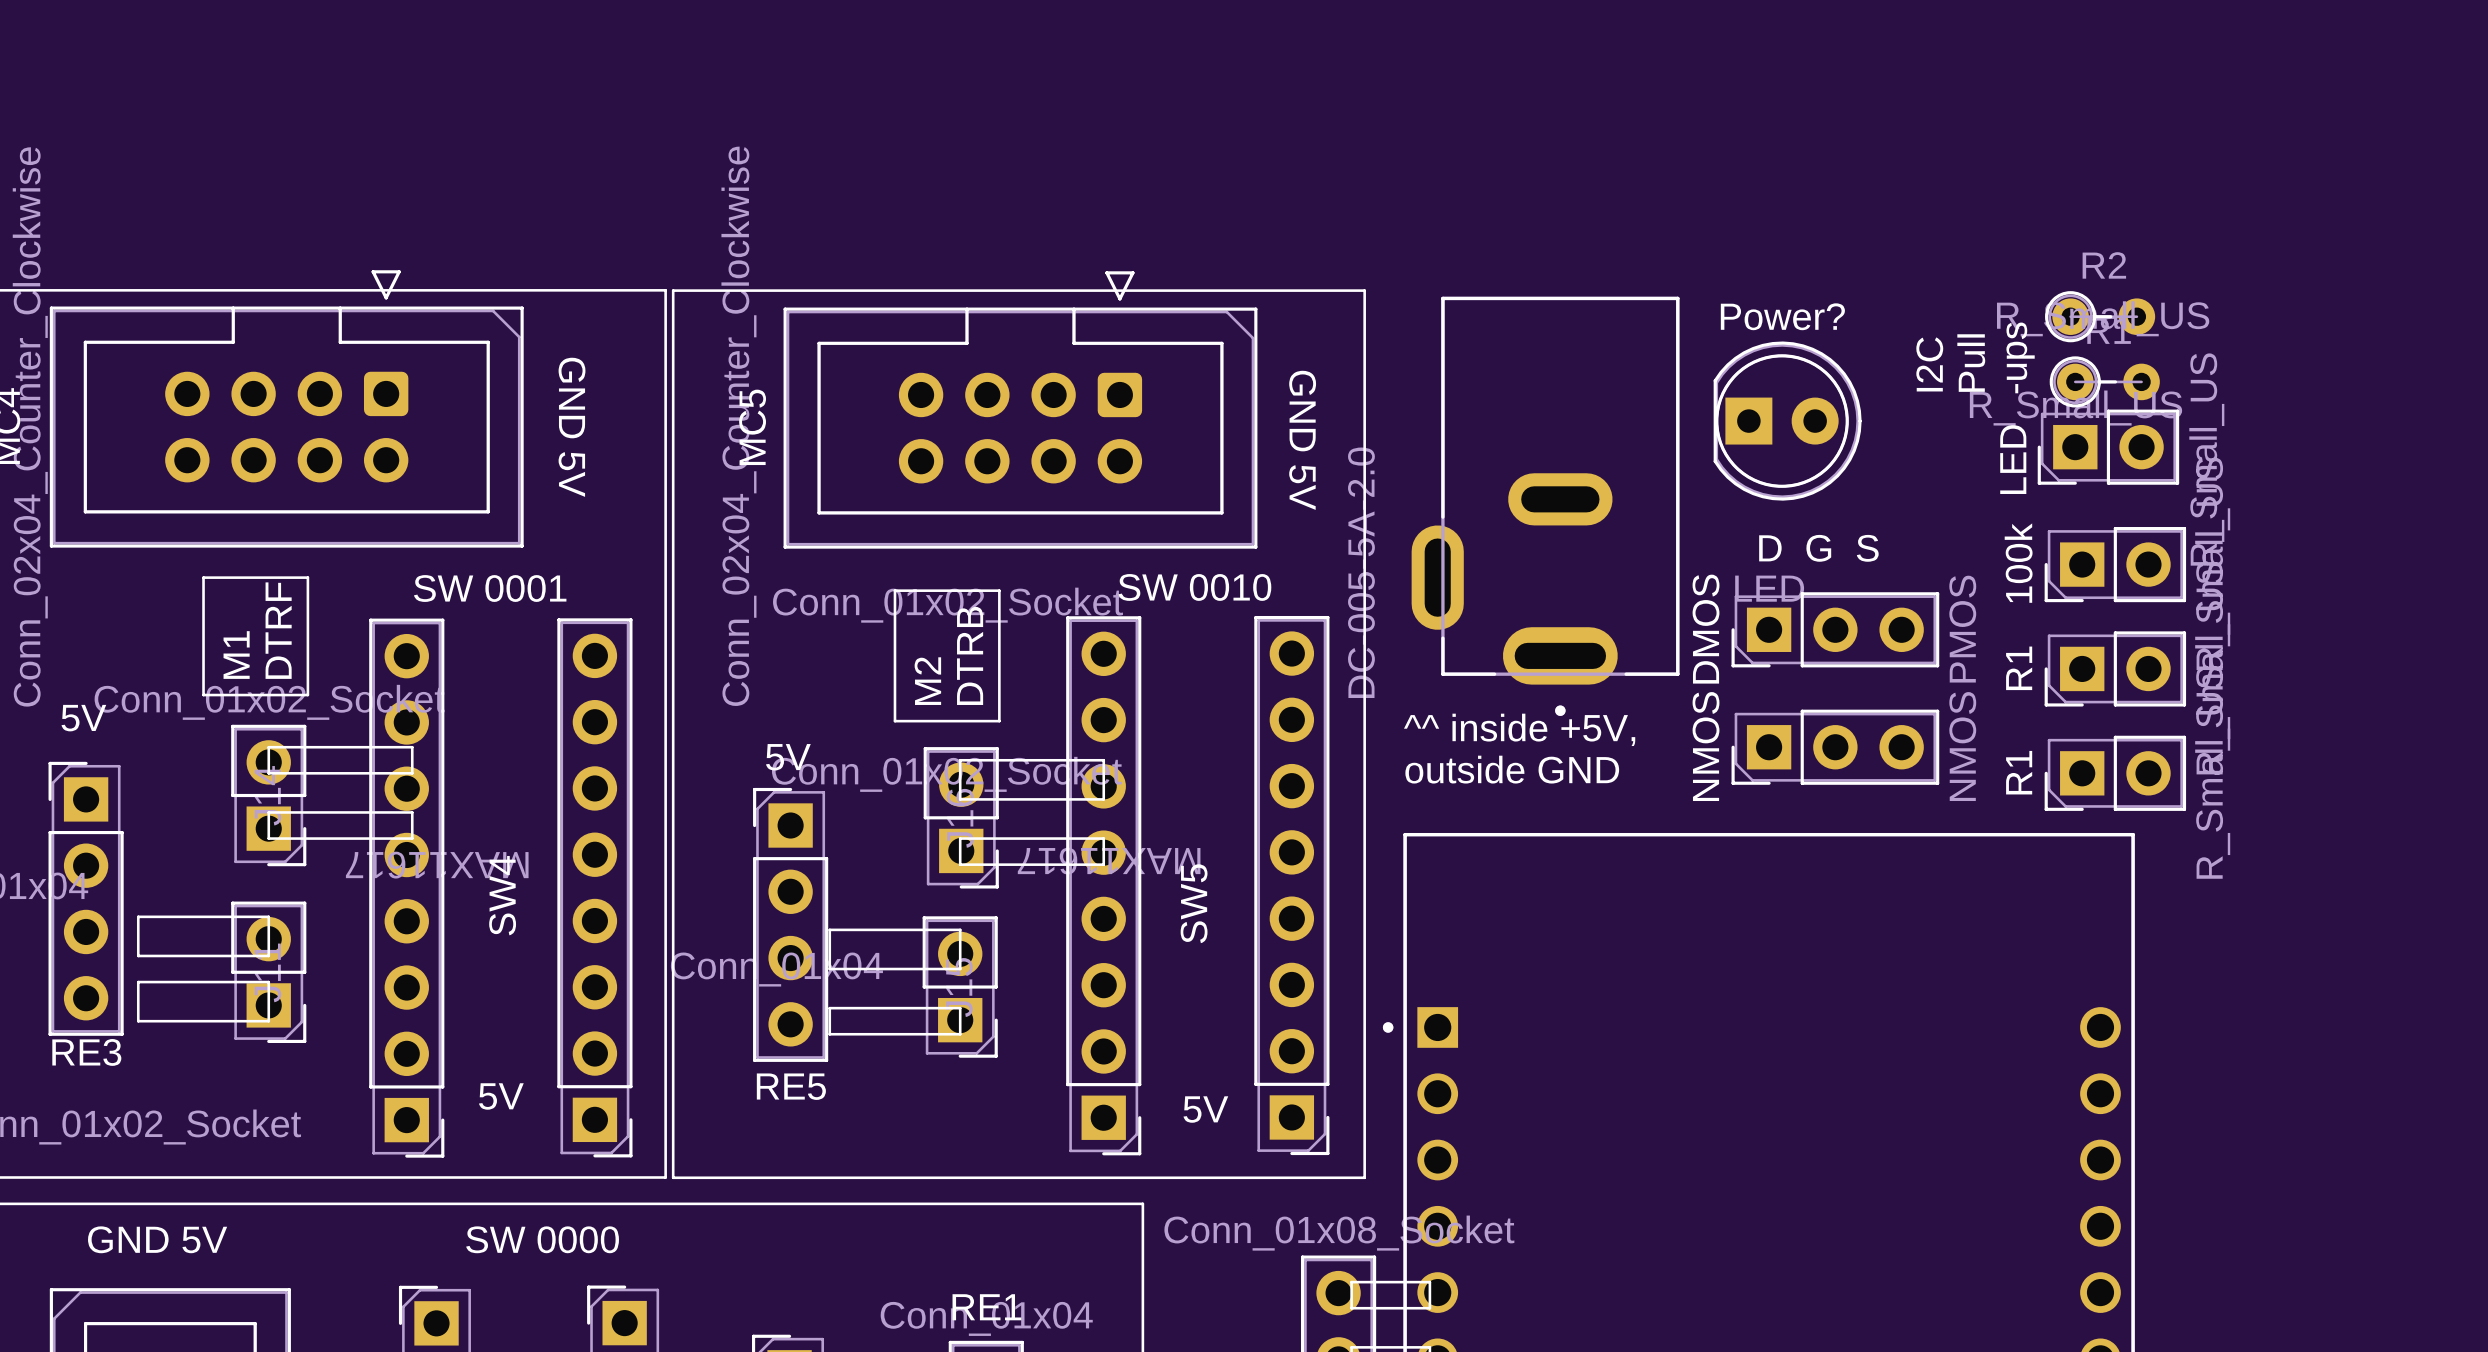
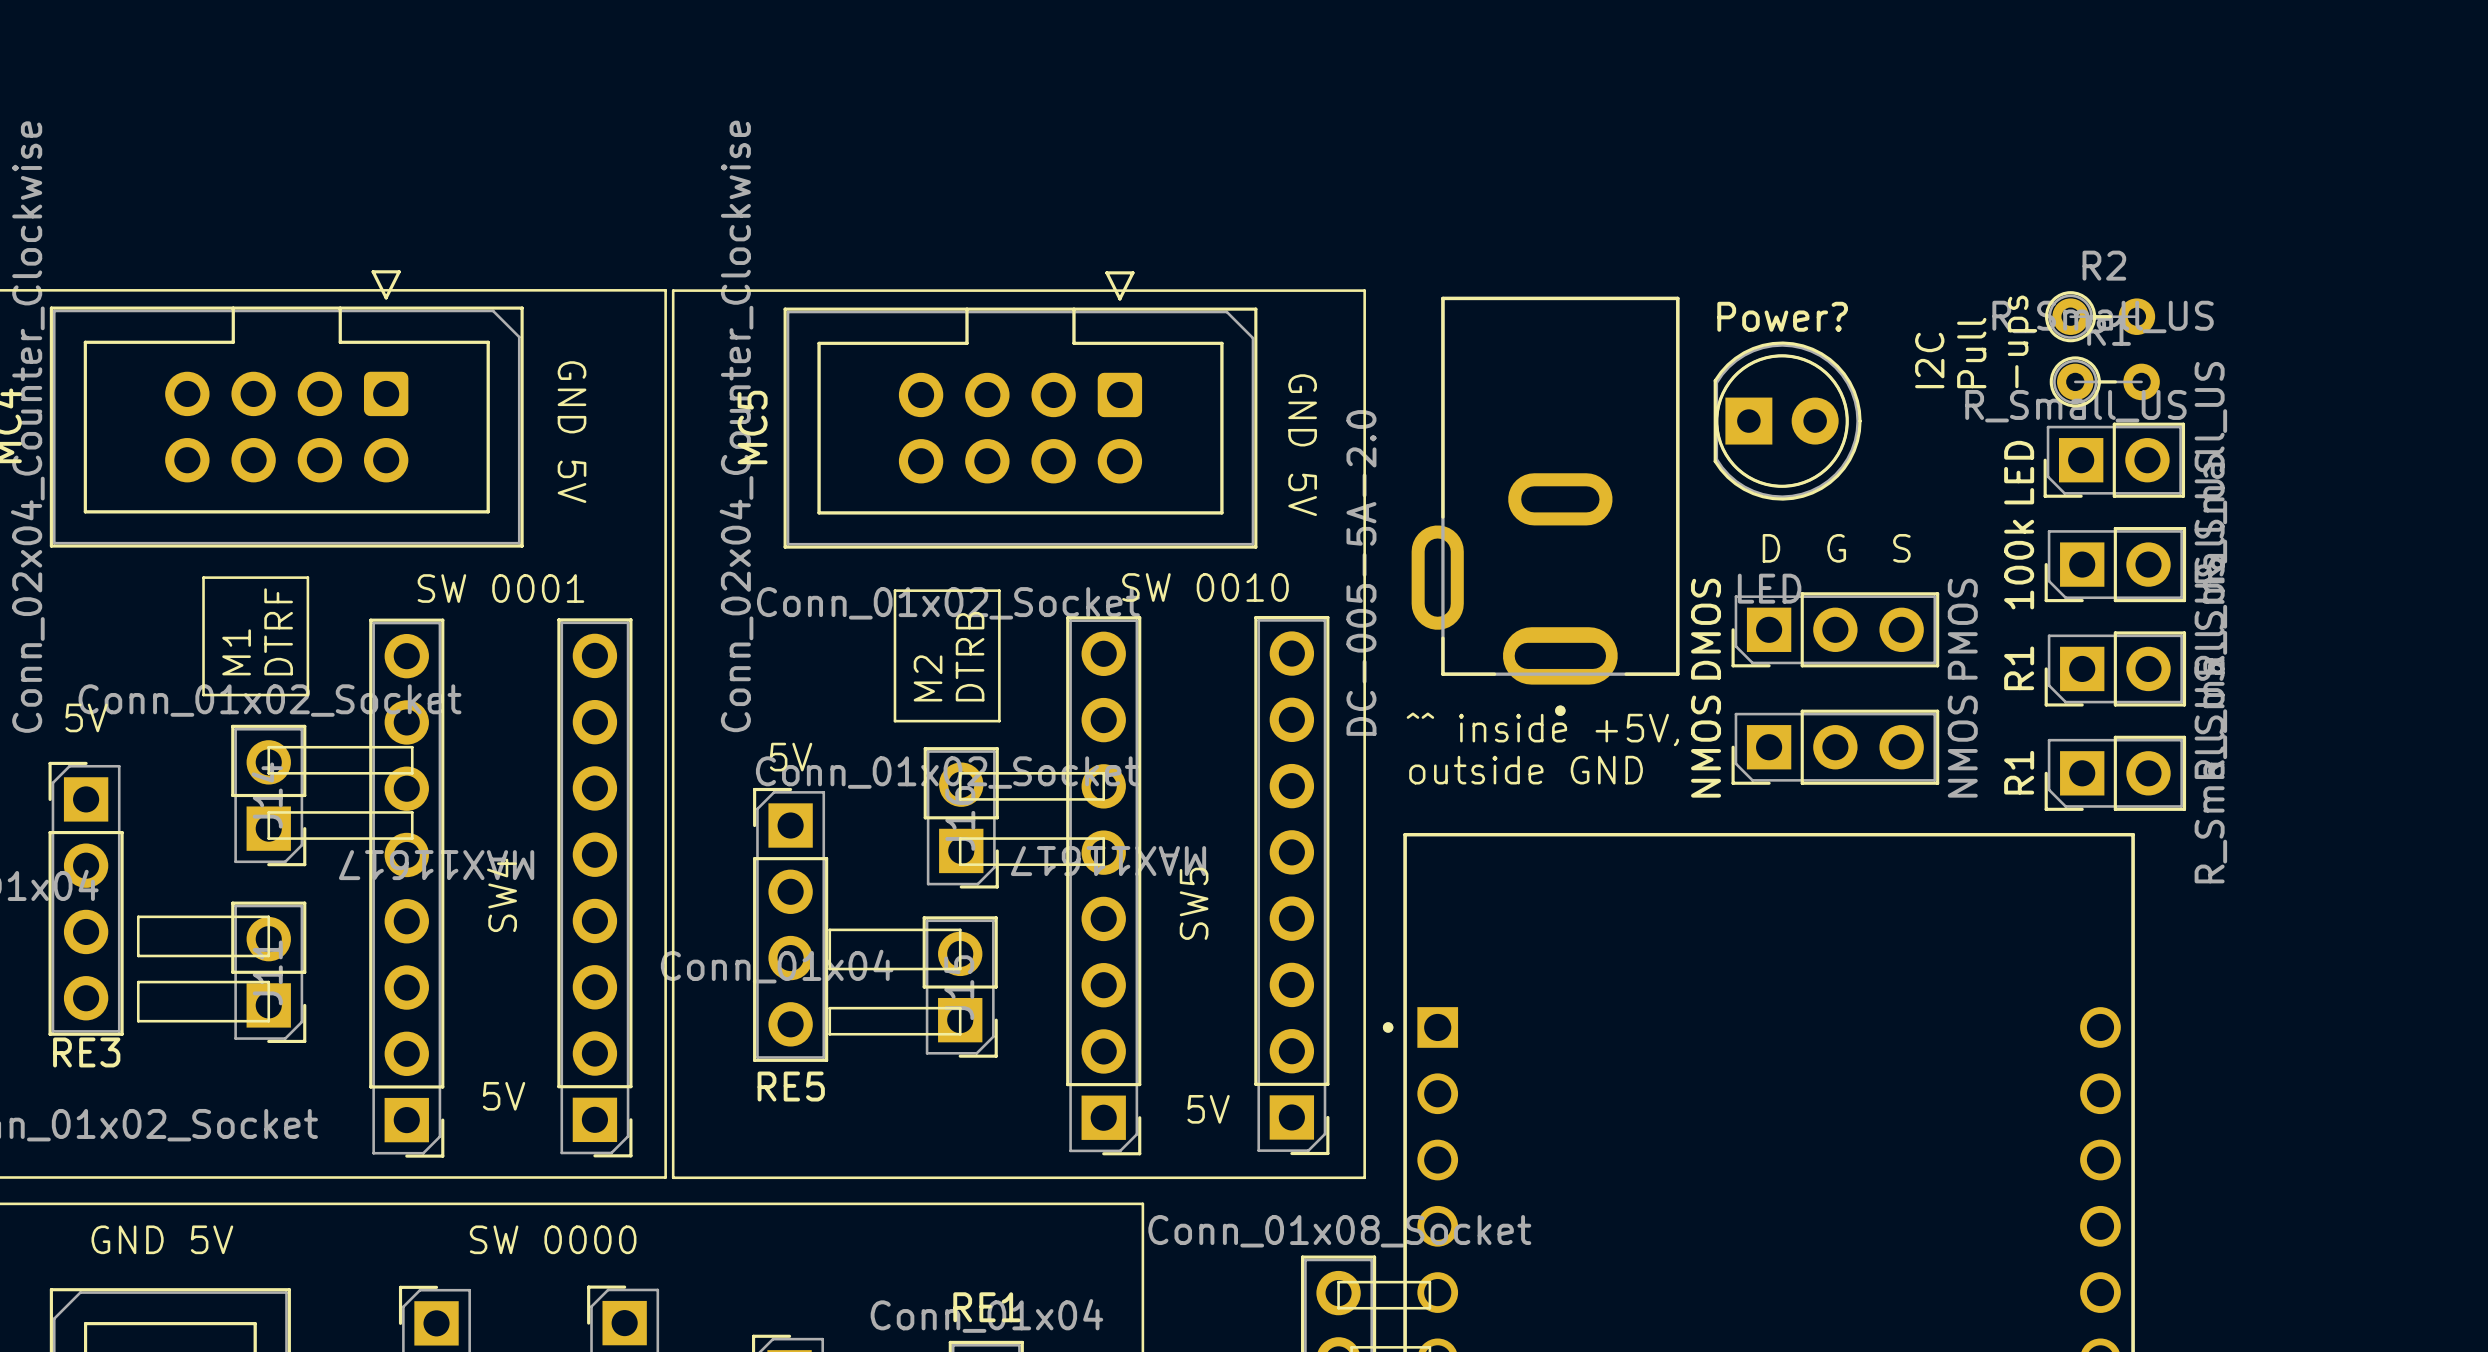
LED position: (2108, 447) -> (2114, 460)
line: (960, 773) (960, 760) (1103, 760) (1103, 773) -> (960, 773) (1103, 773)
line: (1351, 1282) (1351, 1308) -> (1351, 1282) (1338, 1282) (1338, 1308) (1351, 1308)

